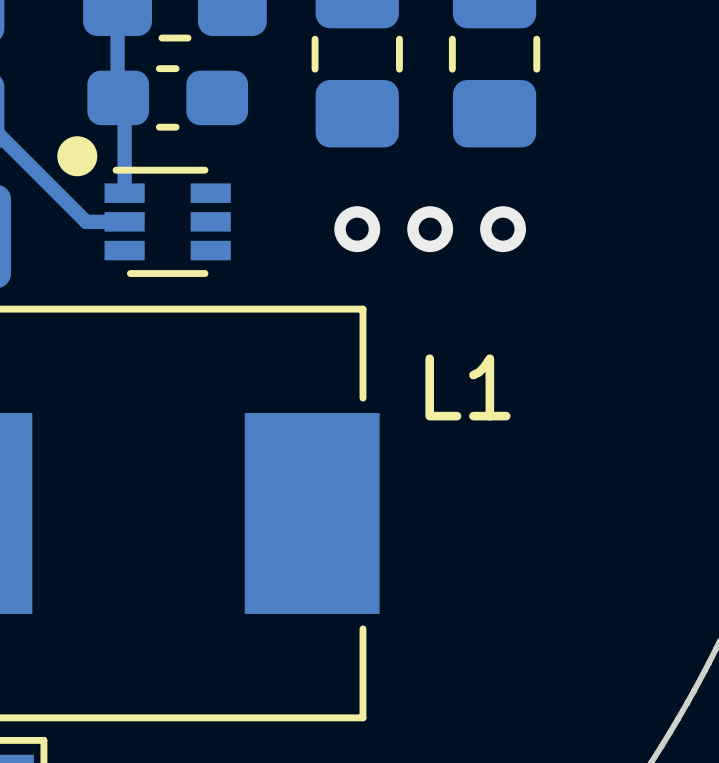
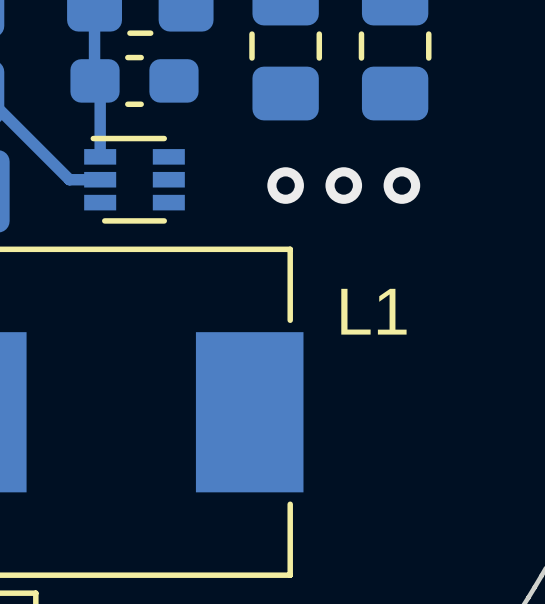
drawing: [57, 136, 98, 177] -> none

